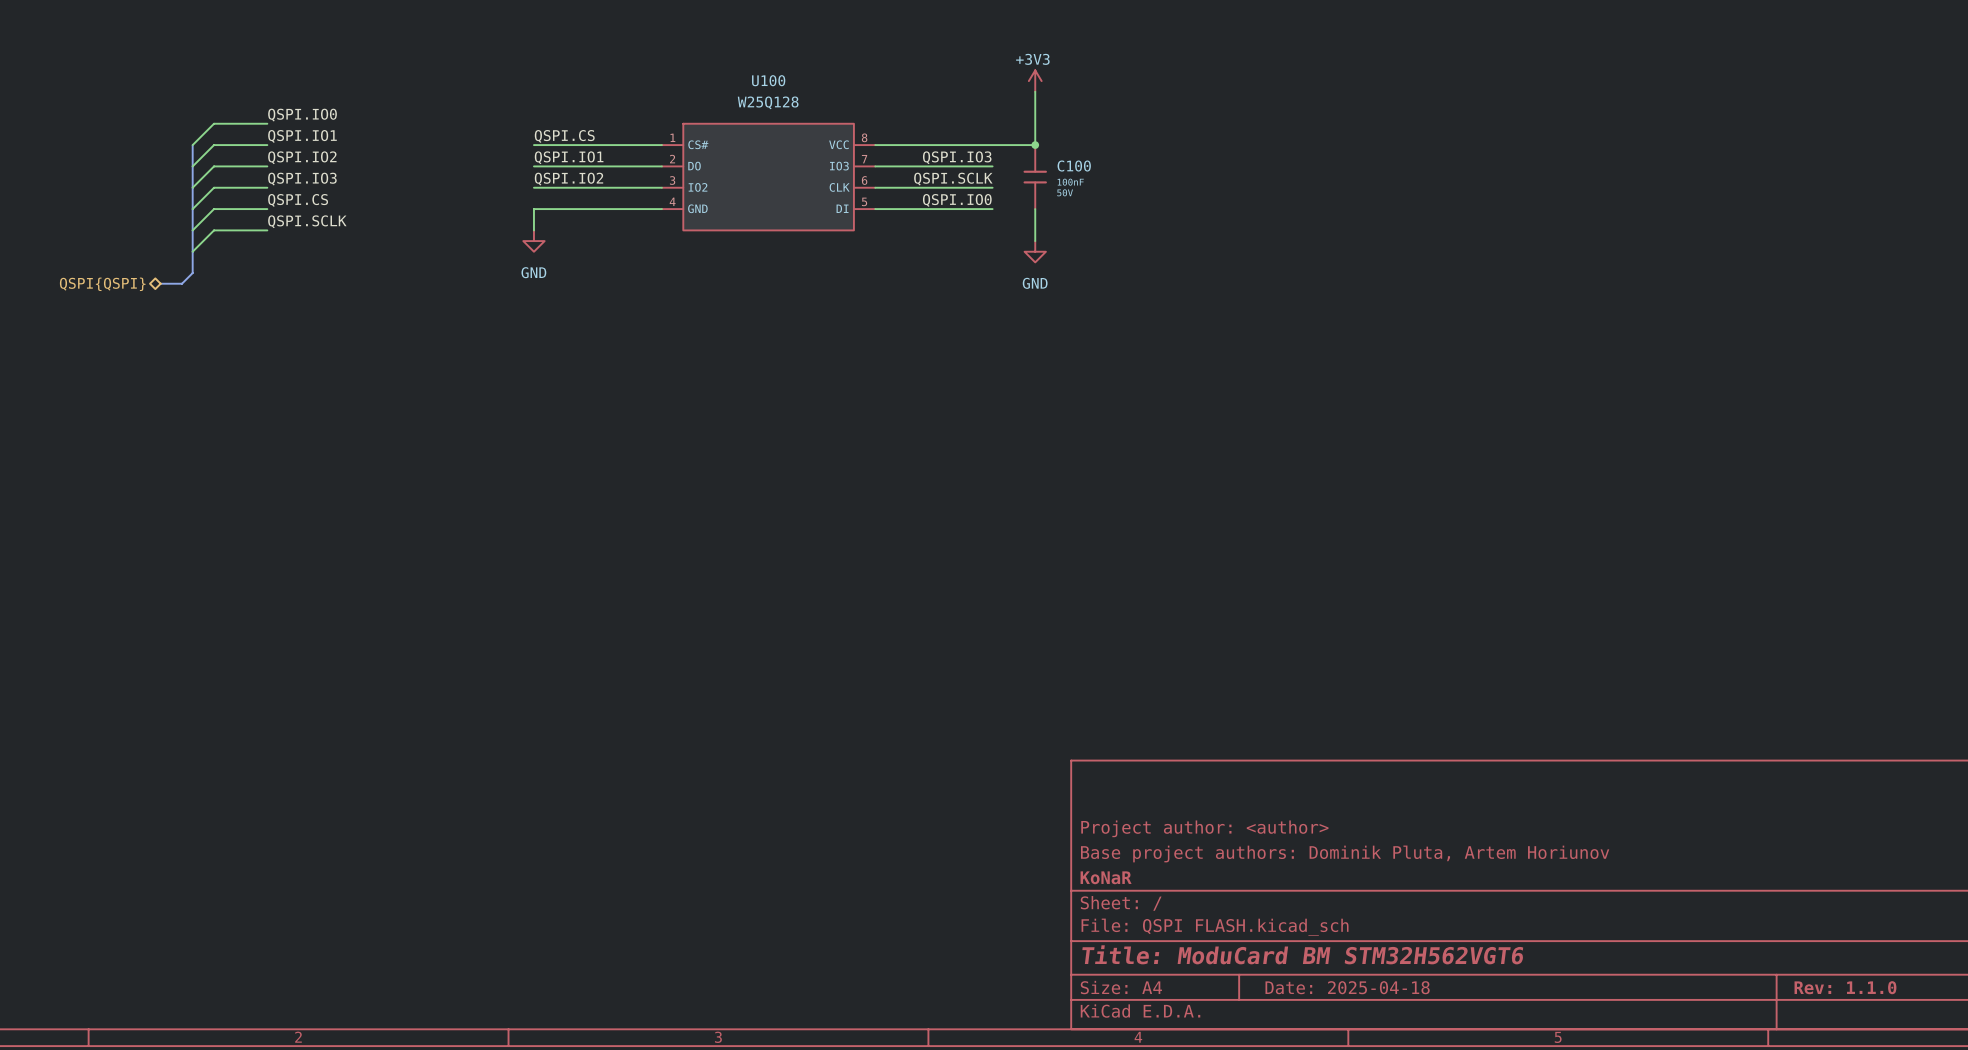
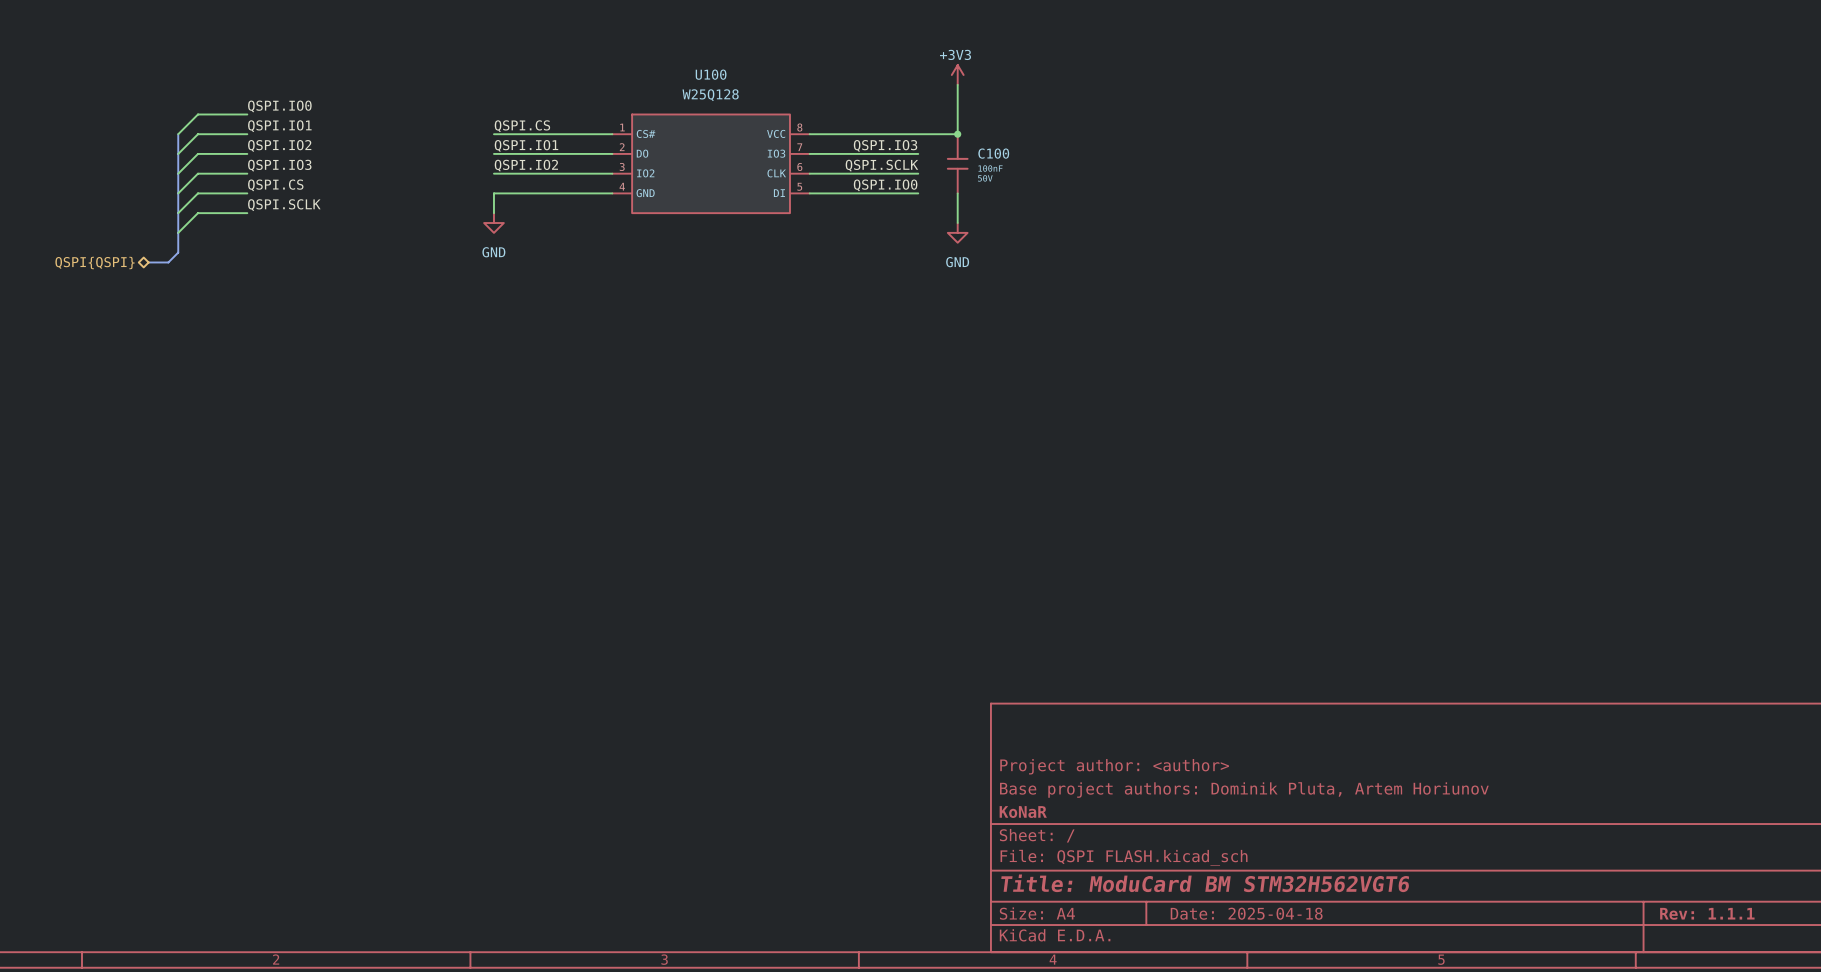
title block: Rev: 1.1.0 (1845, 987) -> Rev: 1.1.1 (1707, 913)

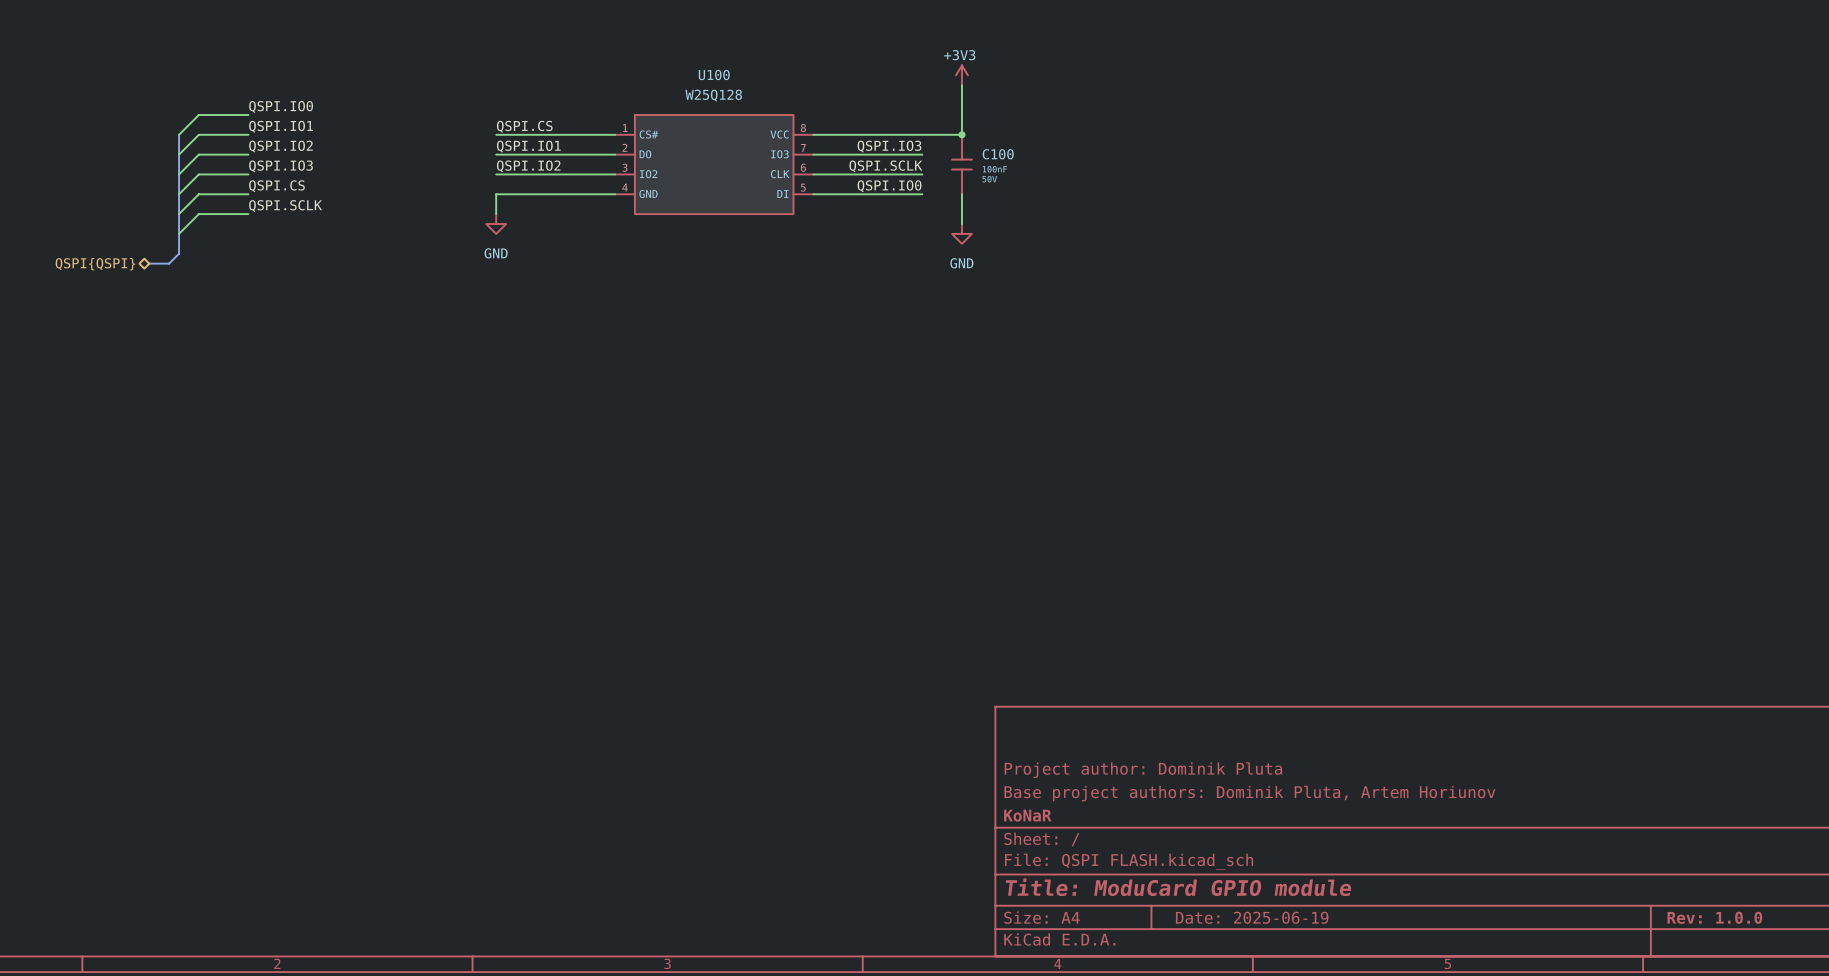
title block: Project author: <author> (1114, 766) -> Project author: Dominik Pluta (1143, 770)
title block: Title: ModuCard BM STM32H562VGT6 (1205, 883) -> Title: ModuCard GPIO module (1178, 887)
title block: Date: 2025-04-18 (1246, 913) -> Date: 2025-06-19 (1252, 917)
title block: Rev: 1.1.1 (1707, 913) -> Rev: 1.0.0 (1714, 917)

